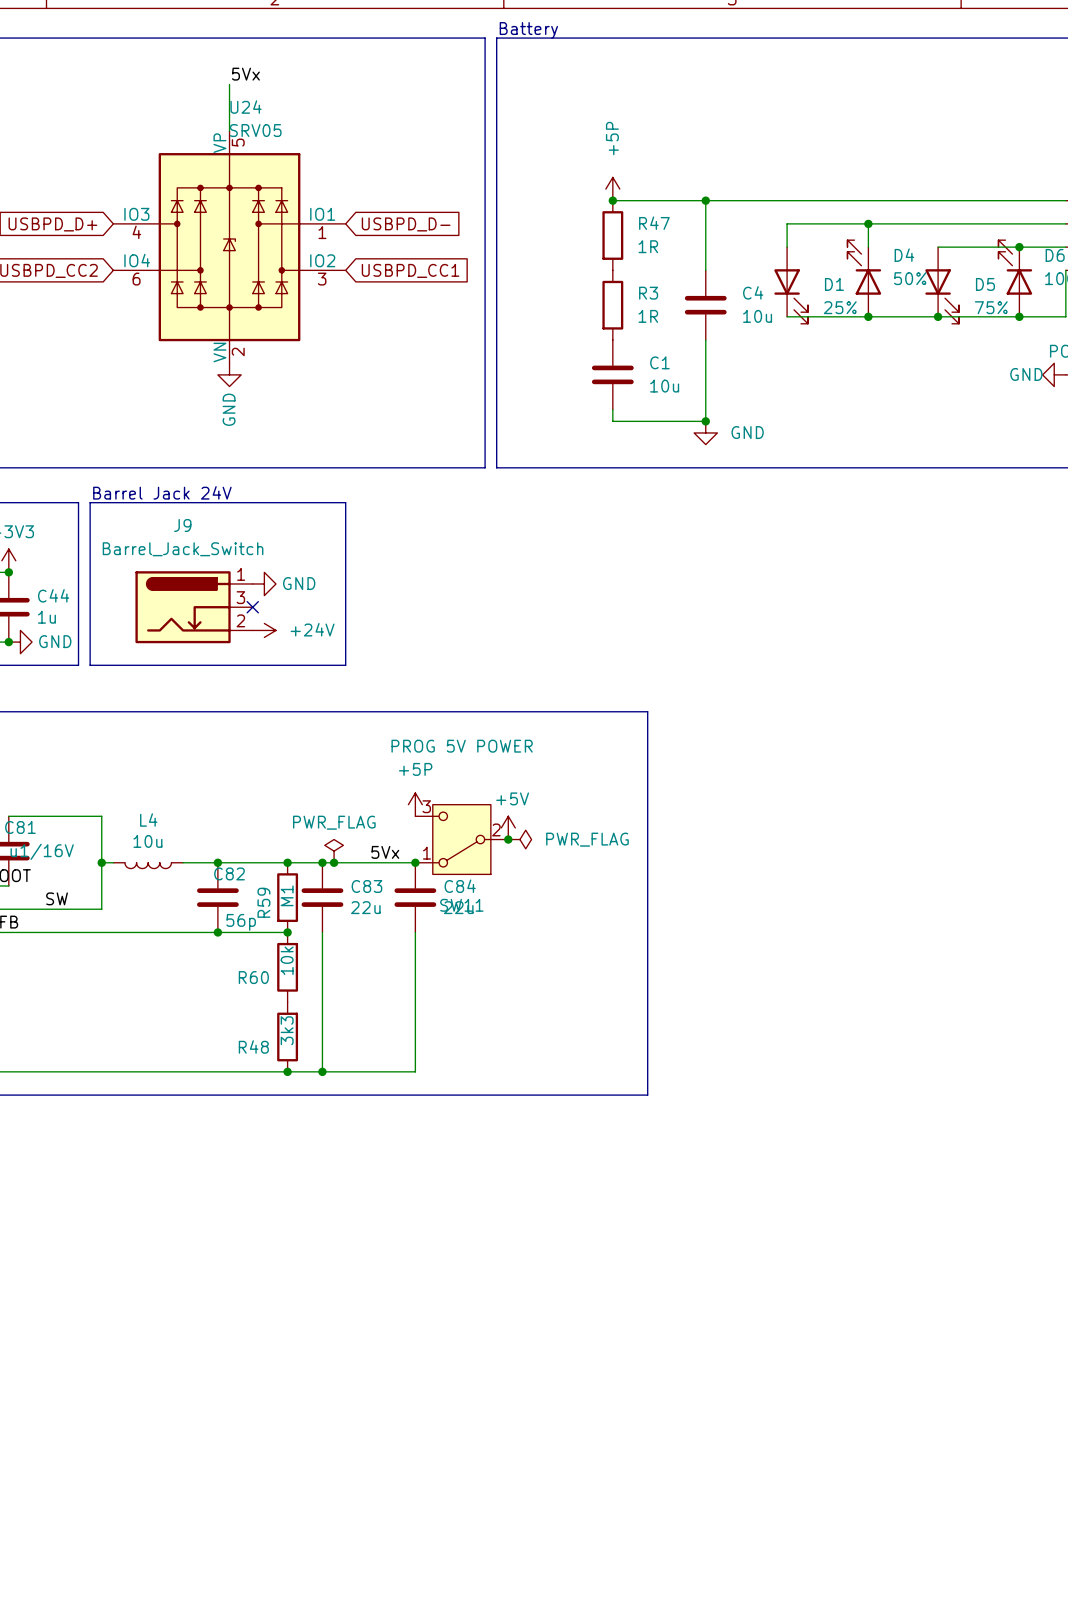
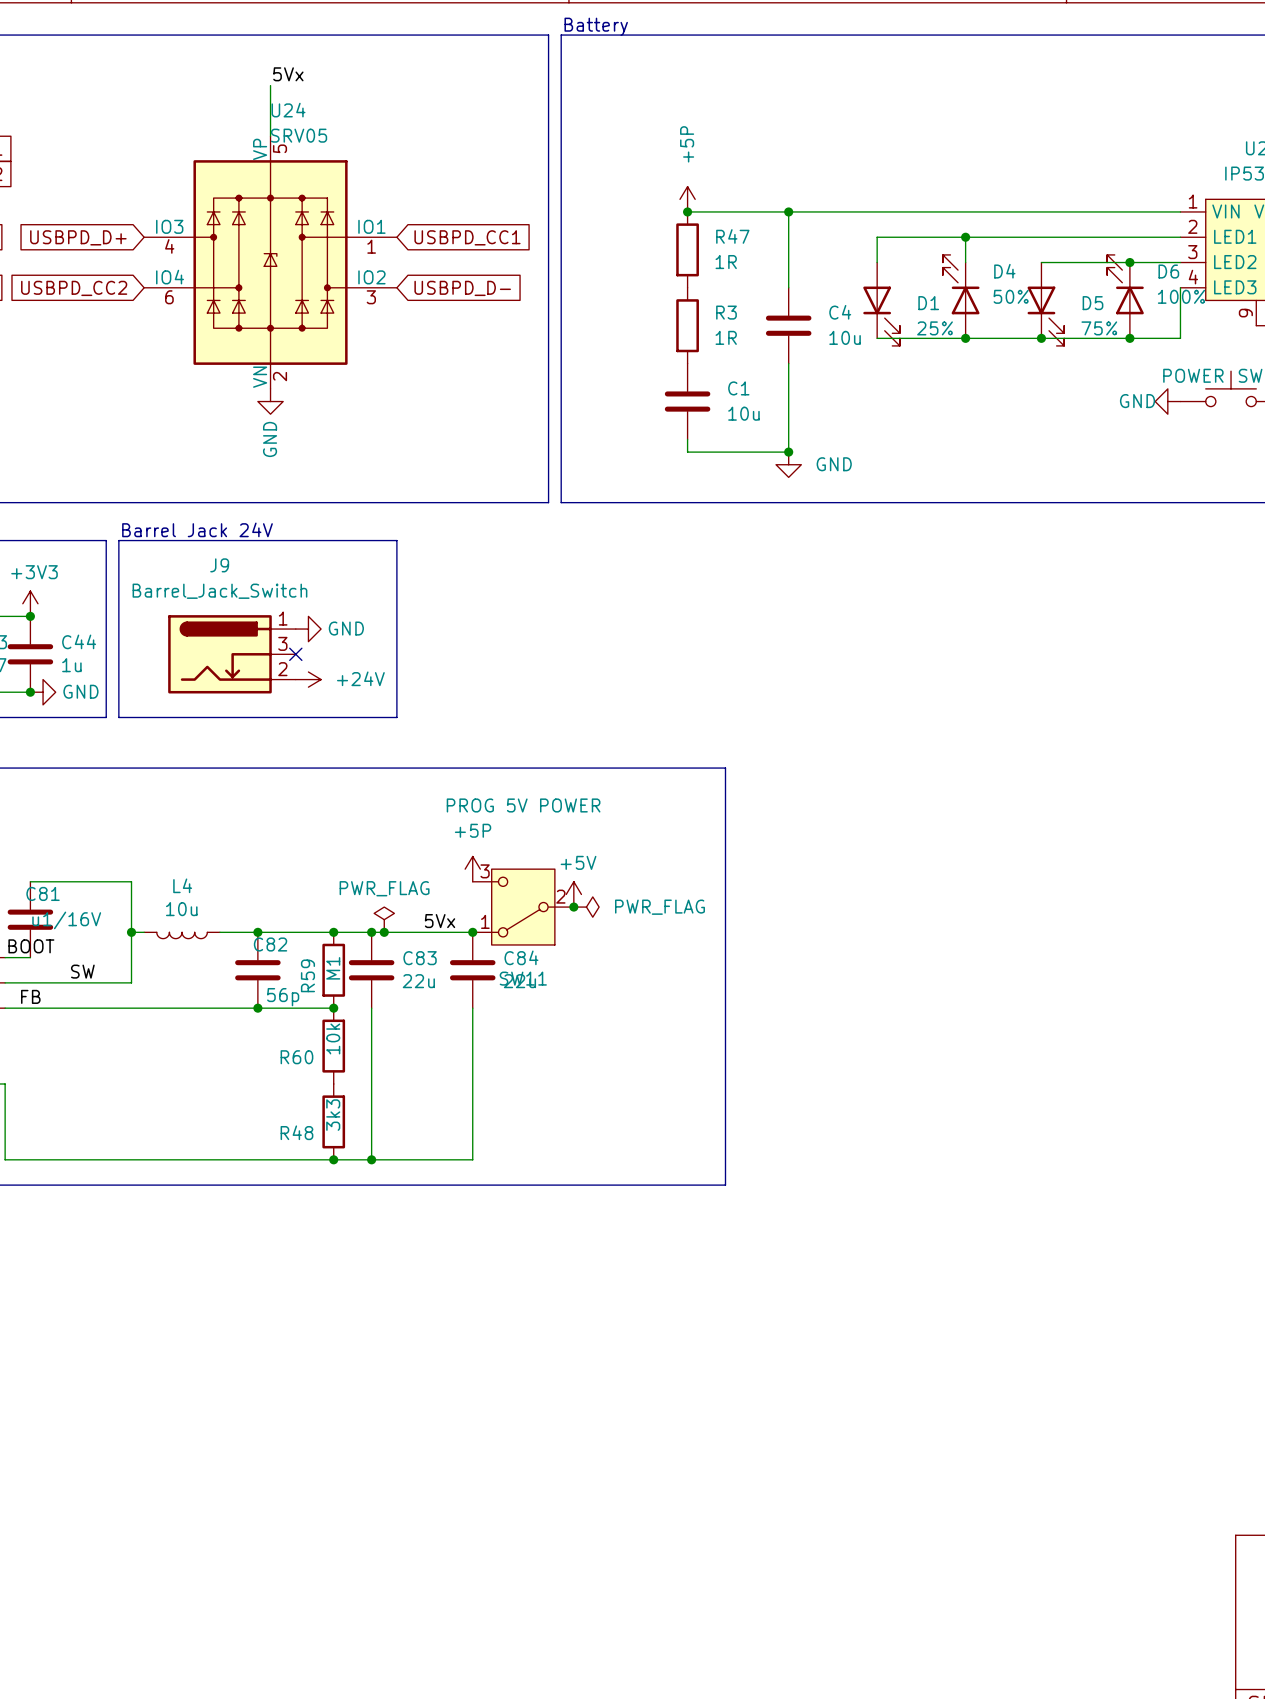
global label: USBPD_D- (406, 224) -> USBPD_CC1 (467, 237)
global label: USBPD_CC1 (410, 270) -> USBPD_D- (462, 288)

